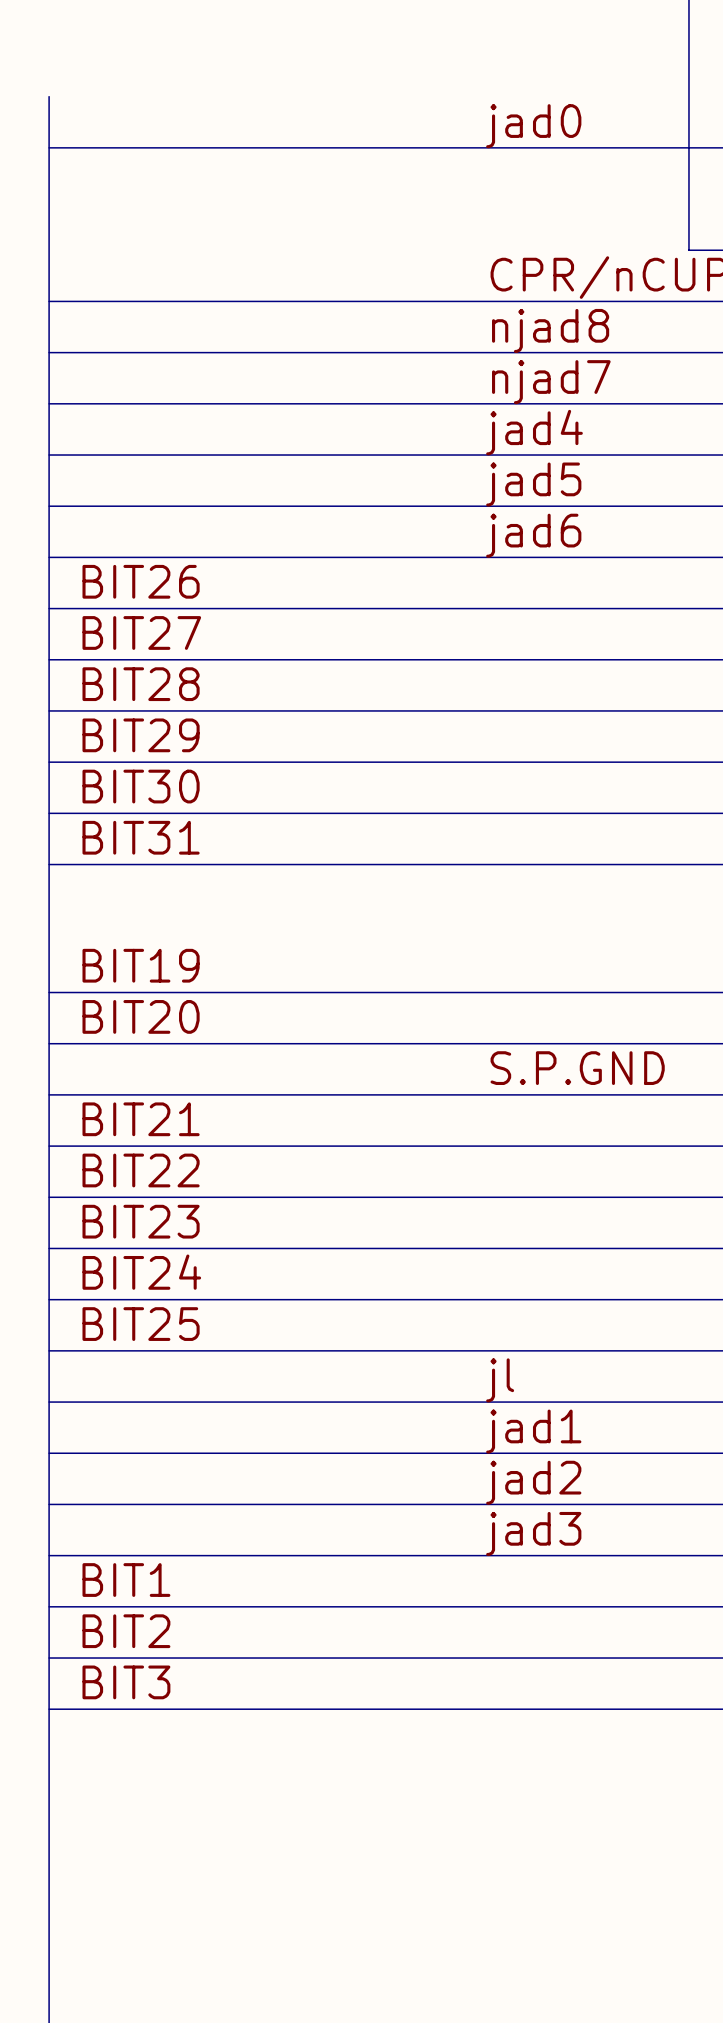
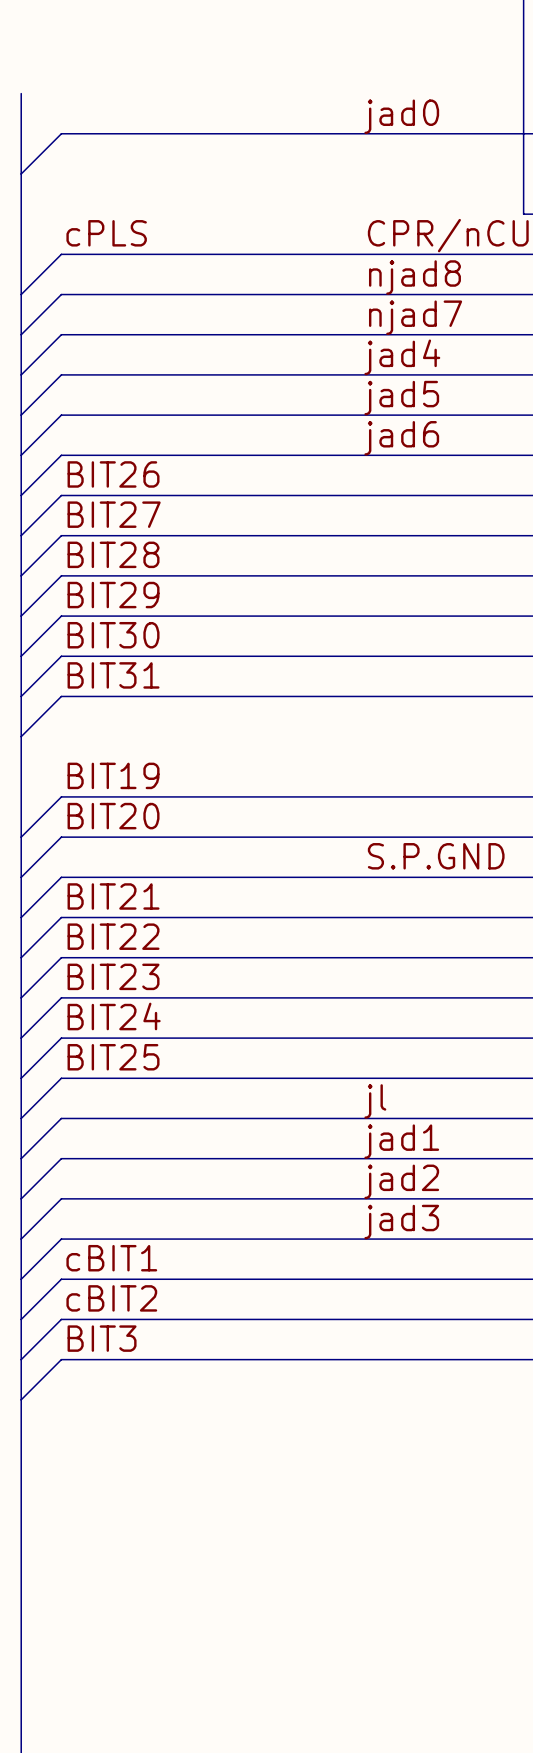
wire: (49, 147) (100, 147) -> (21, 173) (61, 133)
label: none -> cPLS (106, 233)
wire: (49, 301) (100, 301) -> (21, 294) (61, 254)
wire: (49, 352) (100, 352) -> (21, 334) (61, 294)
wire: (49, 403) (100, 403) -> (21, 374) (61, 334)
wire: (49, 455) (100, 455) -> (21, 415) (61, 374)
wire: (49, 506) (100, 506) -> (21, 455) (61, 415)
wire: (49, 557) (100, 557) -> (21, 495) (61, 455)
label position: BIT26 (141, 581) -> BIT26 (113, 474)
wire: (49, 608) (100, 608) -> (21, 535) (61, 495)
label position: BIT27 (141, 632) -> BIT27 (114, 514)
wire: (49, 659) (100, 659) -> (21, 575) (61, 535)
label position: BIT28 (141, 684) -> BIT28 (113, 554)
wire: (49, 710) (100, 710) -> (21, 616) (61, 575)
label position: BIT29 (141, 735) -> BIT29 (113, 595)
wire: (49, 762) (100, 762) -> (21, 656) (61, 616)
label position: BIT30 (141, 786) -> BIT30 (113, 635)
wire: (49, 813) (100, 813) -> (21, 696) (61, 656)
label position: BIT31 (141, 837) -> BIT31 (113, 675)
wire: (49, 864) (100, 864) -> (21, 736) (61, 696)
label position: BIT19 (141, 965) -> BIT19 (113, 775)
wire: (49, 992) (100, 992) -> (21, 837) (61, 796)
label position: BIT20 (141, 1016) -> BIT20 (113, 816)
wire: (49, 1043) (100, 1043) -> (21, 877) (61, 837)
wire: (49, 1094) (100, 1094) -> (21, 917) (61, 877)
label position: BIT21 (141, 1119) -> BIT21 (113, 896)
wire: (49, 1146) (100, 1146) -> (21, 957) (61, 917)
label position: BIT22 (141, 1170) -> BIT22 (113, 936)
wire: (49, 1197) (100, 1197) -> (21, 997) (61, 957)
label position: BIT23 (141, 1221) -> BIT23 (113, 976)
wire: (49, 1248) (100, 1248) -> (21, 1038) (61, 997)
label position: BIT24 (141, 1272) -> BIT24 (114, 1016)
wire: (49, 1299) (100, 1299) -> (21, 1078) (61, 1038)
label position: BIT25 (141, 1324) -> BIT25 (113, 1057)
wire: (49, 1350) (100, 1350) -> (21, 1118) (61, 1078)
wire: (49, 1402) (100, 1402) -> (21, 1158) (61, 1118)
wire: (49, 1453) (100, 1453) -> (21, 1198) (61, 1158)
wire: (49, 1504) (100, 1504) -> (21, 1239) (61, 1198)
wire: (49, 1555) (100, 1555) -> (21, 1279) (61, 1239)
label: BIT1 (126, 1580) -> cBIT1 (111, 1258)
wire: (49, 1606) (100, 1606) -> (21, 1319) (61, 1279)
label: BIT2 (126, 1631) -> cBIT2 (111, 1298)
wire: (49, 1658) (100, 1658) -> (21, 1359) (61, 1319)
label position: BIT3 (126, 1682) -> BIT3 (102, 1338)
wire: (49, 1709) (100, 1709) -> (21, 1399) (61, 1359)

